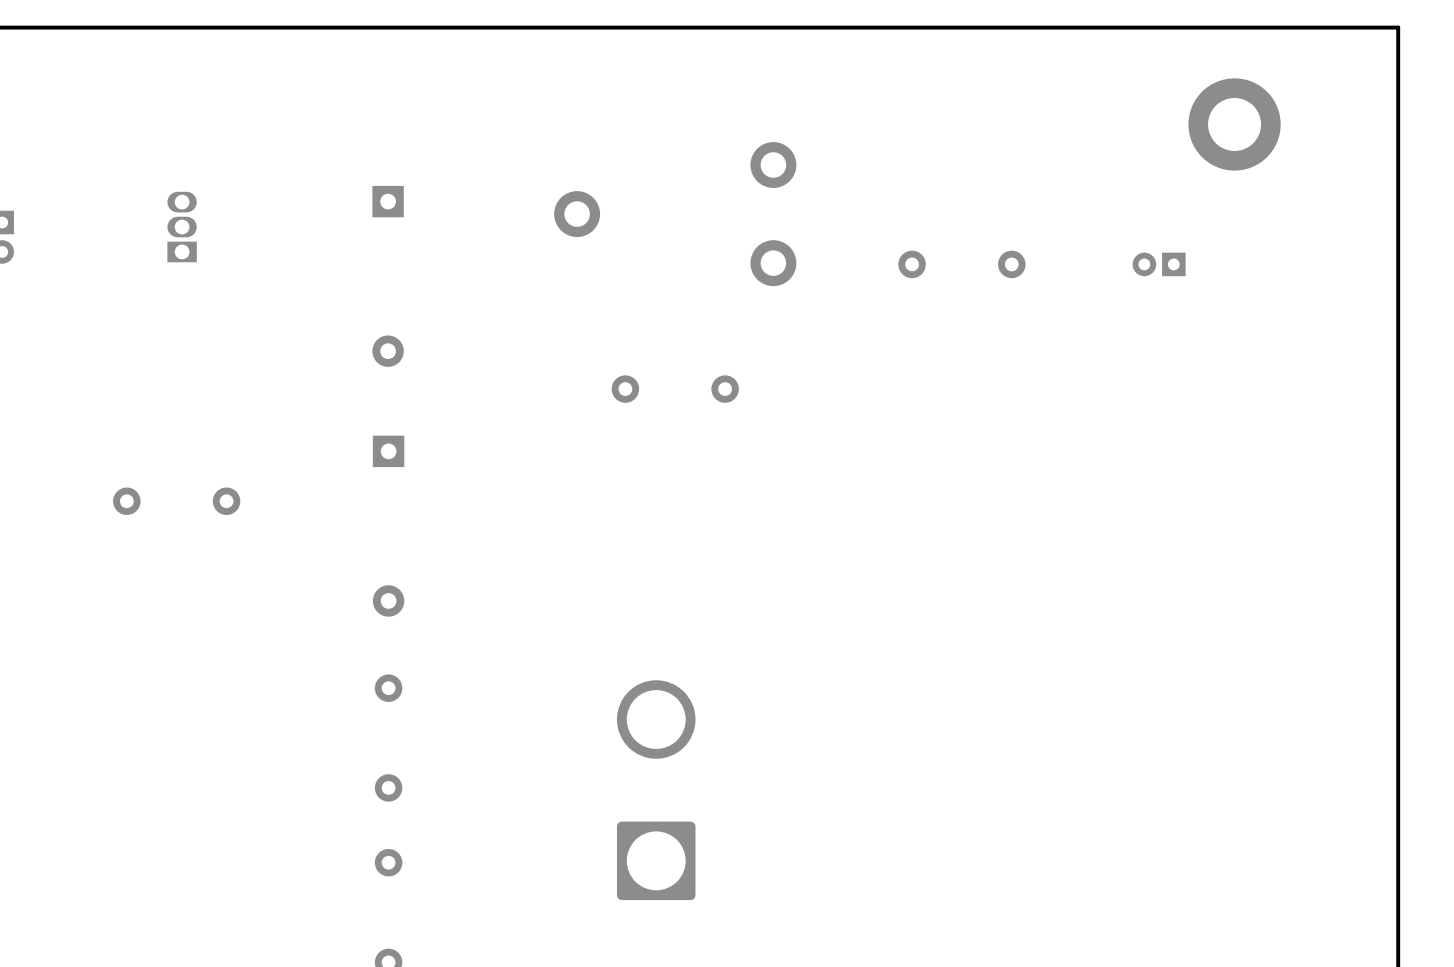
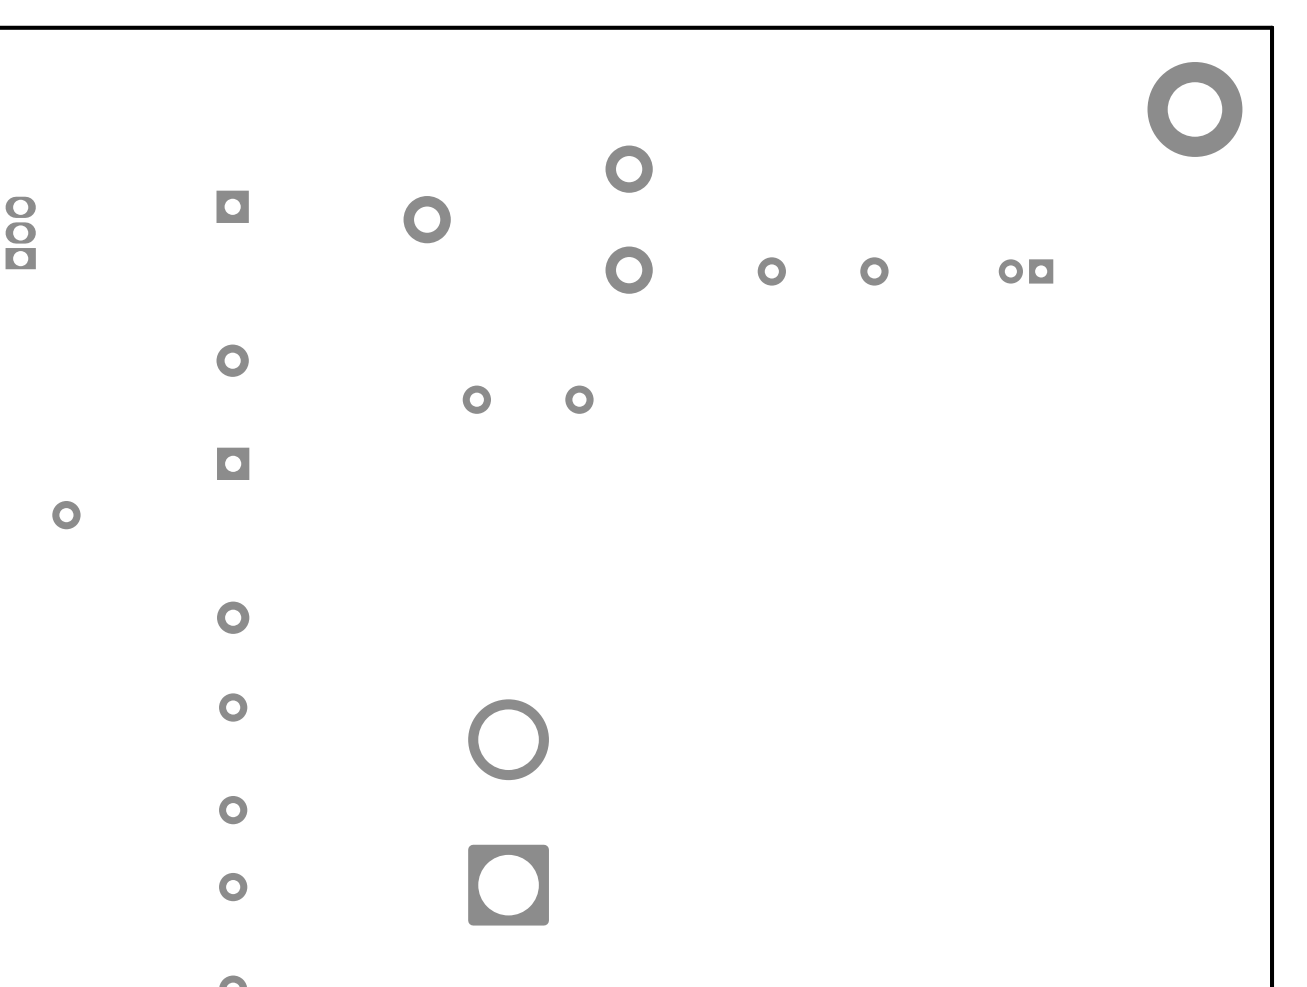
part position: (1234, 124) -> (1194, 109)

